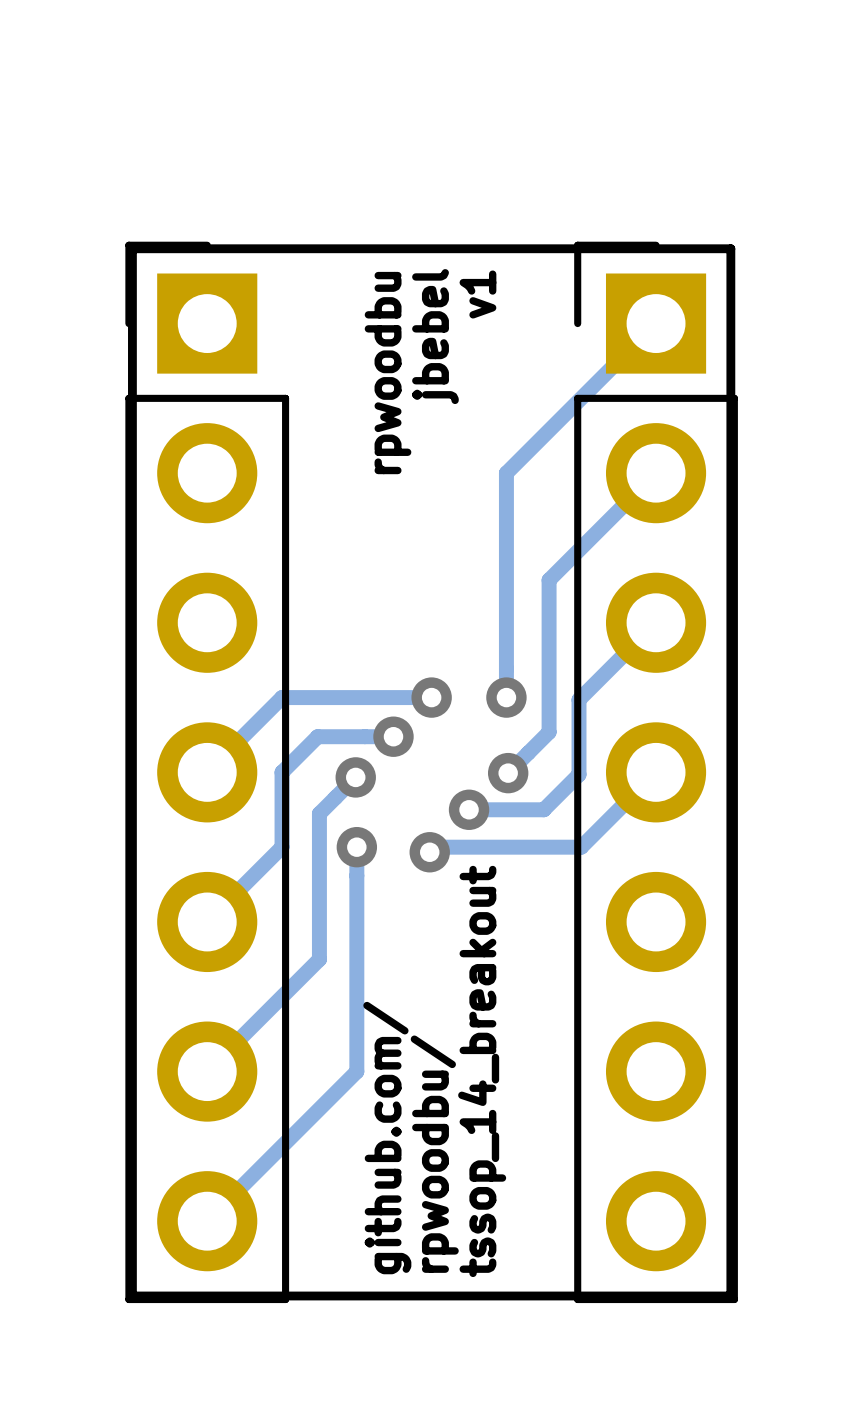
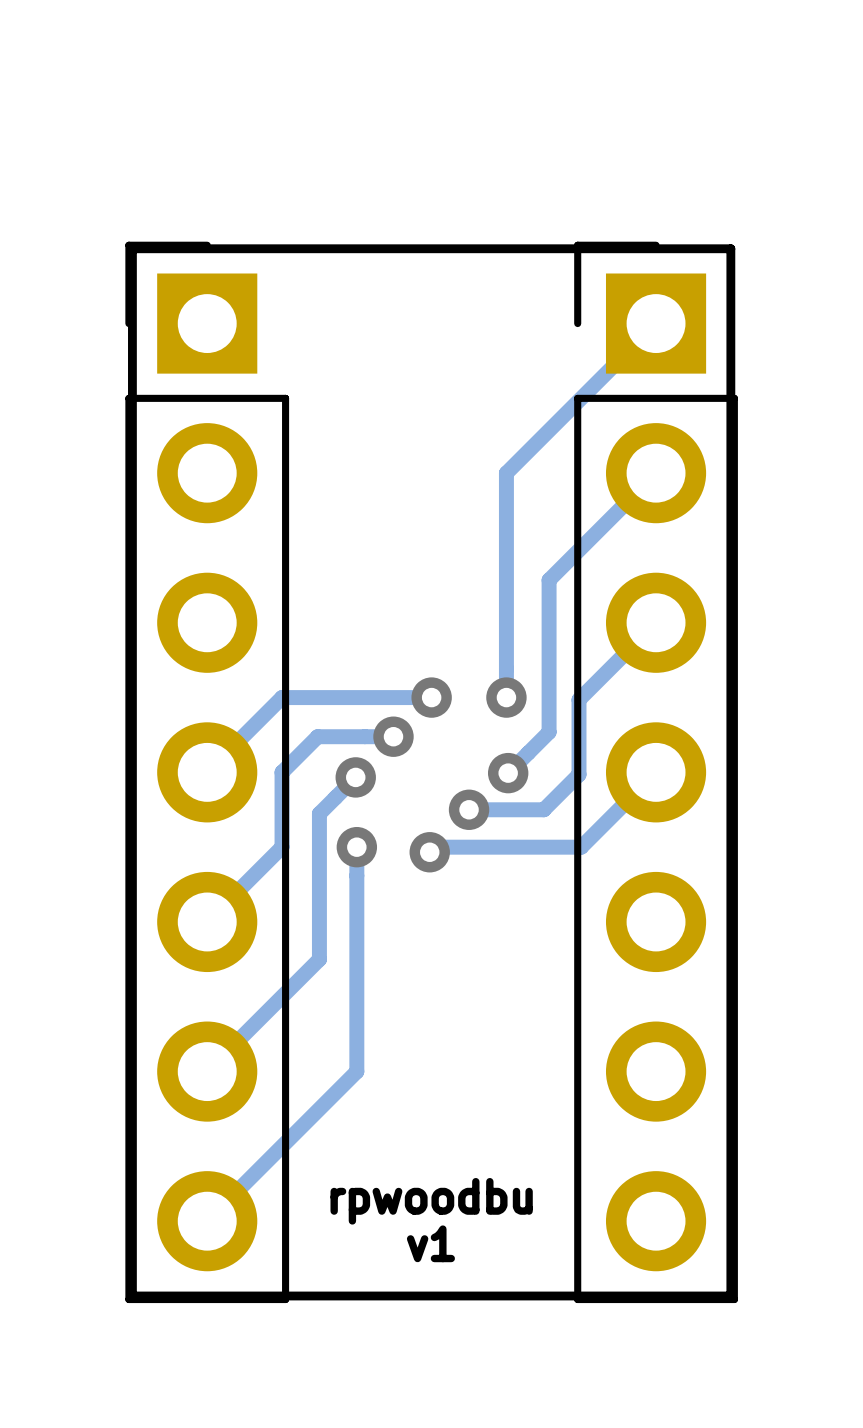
text rotation: 0° (477, 294) -> 90° clockwise (430, 1243)
text position: v1 (477, 294) -> v1 (430, 1243)
text: jbebel (435, 336) -> none
text rotation: 0° (388, 373) -> 90° clockwise (431, 1201)
text position: rpwoodbu (388, 373) -> rpwoodbu (431, 1201)
text: tssop_14_breakout (482, 1071) -> none
text: github.com/ (387, 1138) -> none
text: rpwoodbu/ (434, 1154) -> none

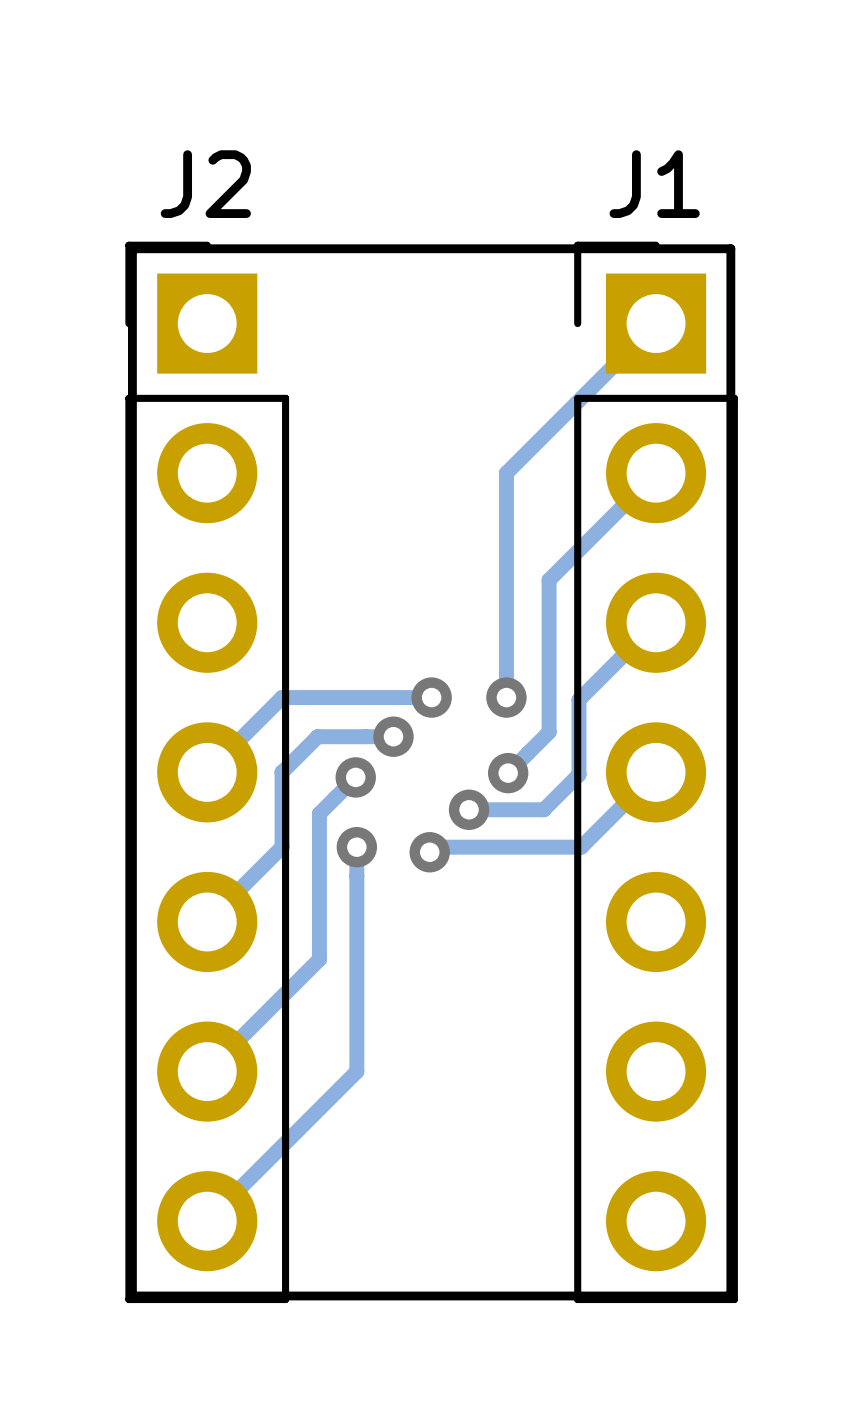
J2 name: none -> J2 (205, 184)
J1 name: none -> J1 (654, 184)
text: rpwoodbu (431, 1201) -> none
text: v1 (430, 1243) -> none

